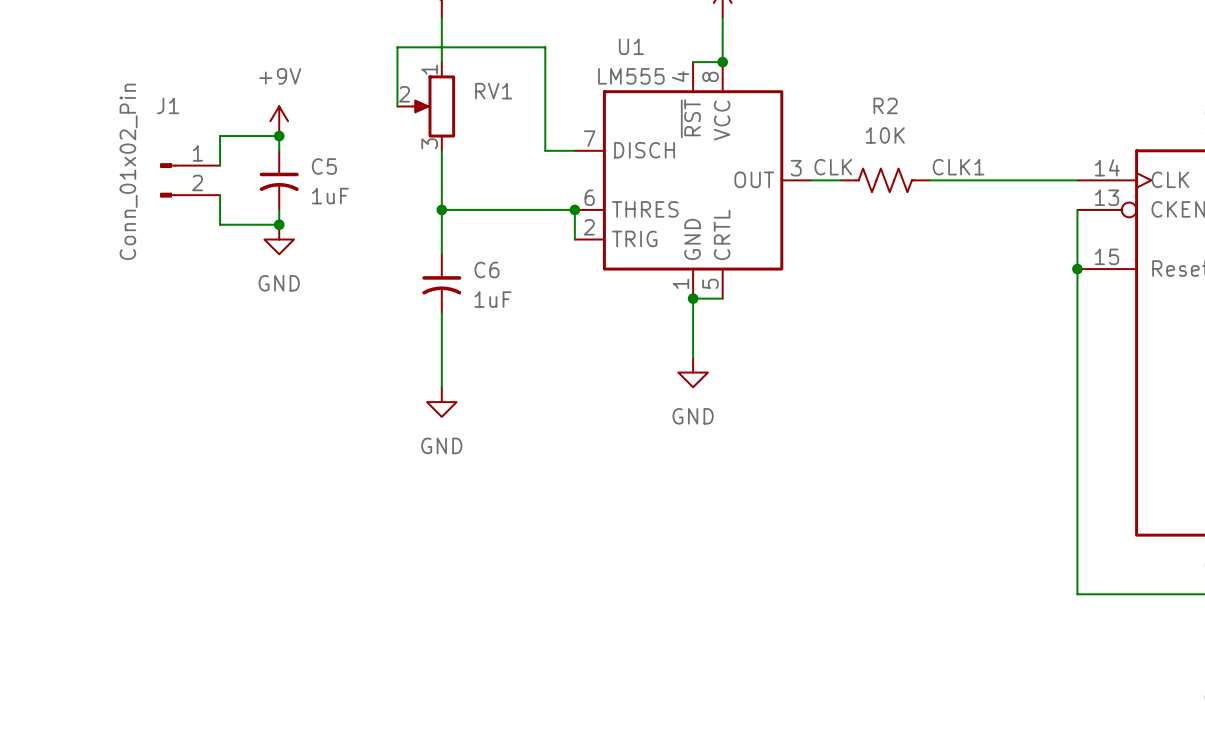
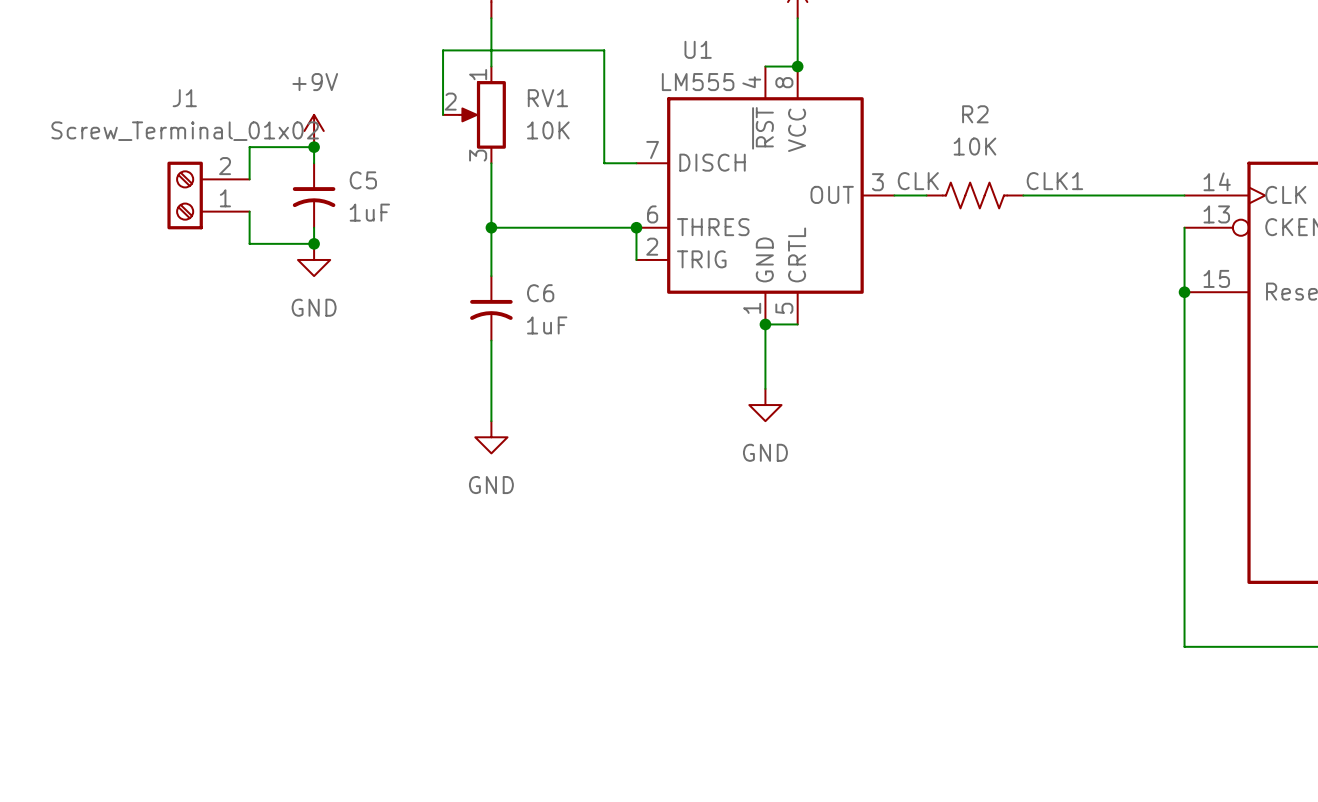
RV1 value: none -> 10K (548, 130)
J1 symbol: [160, 163, 221, 198] -> [167, 161, 250, 230]
J1 value: Conn_01x02_Pin (128, 171) -> Screw_Terminal_01x02 (185, 131)

